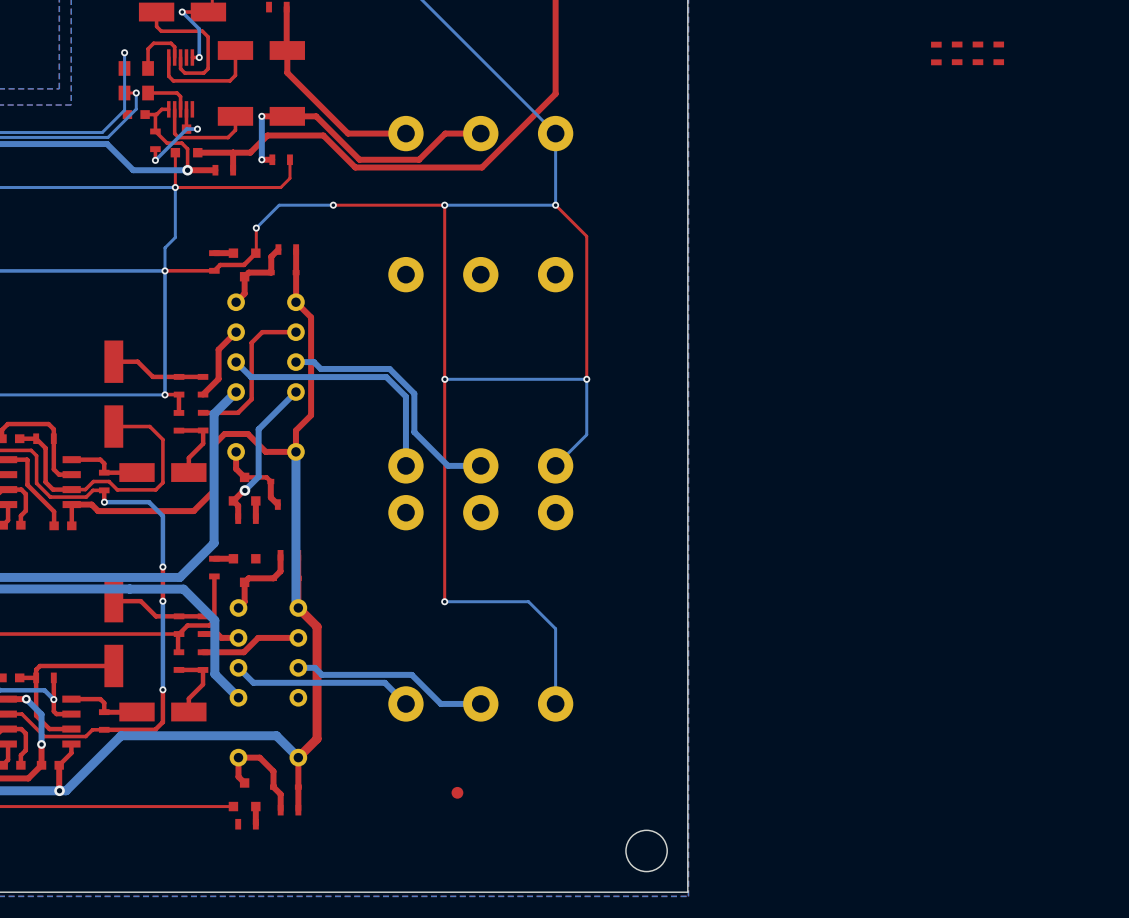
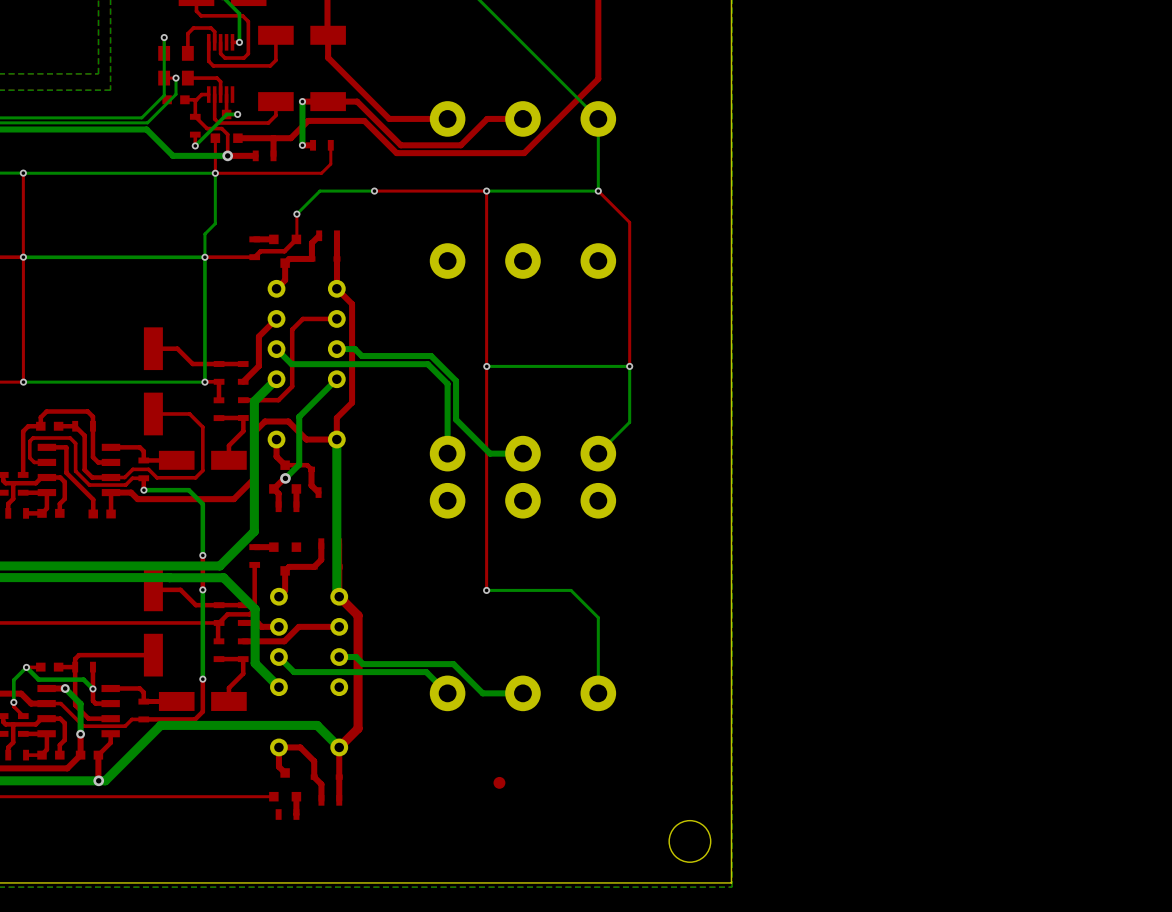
part: (936, 53) -> none
part: (957, 53) -> none
part: (977, 53) -> none
part: (998, 53) -> none

